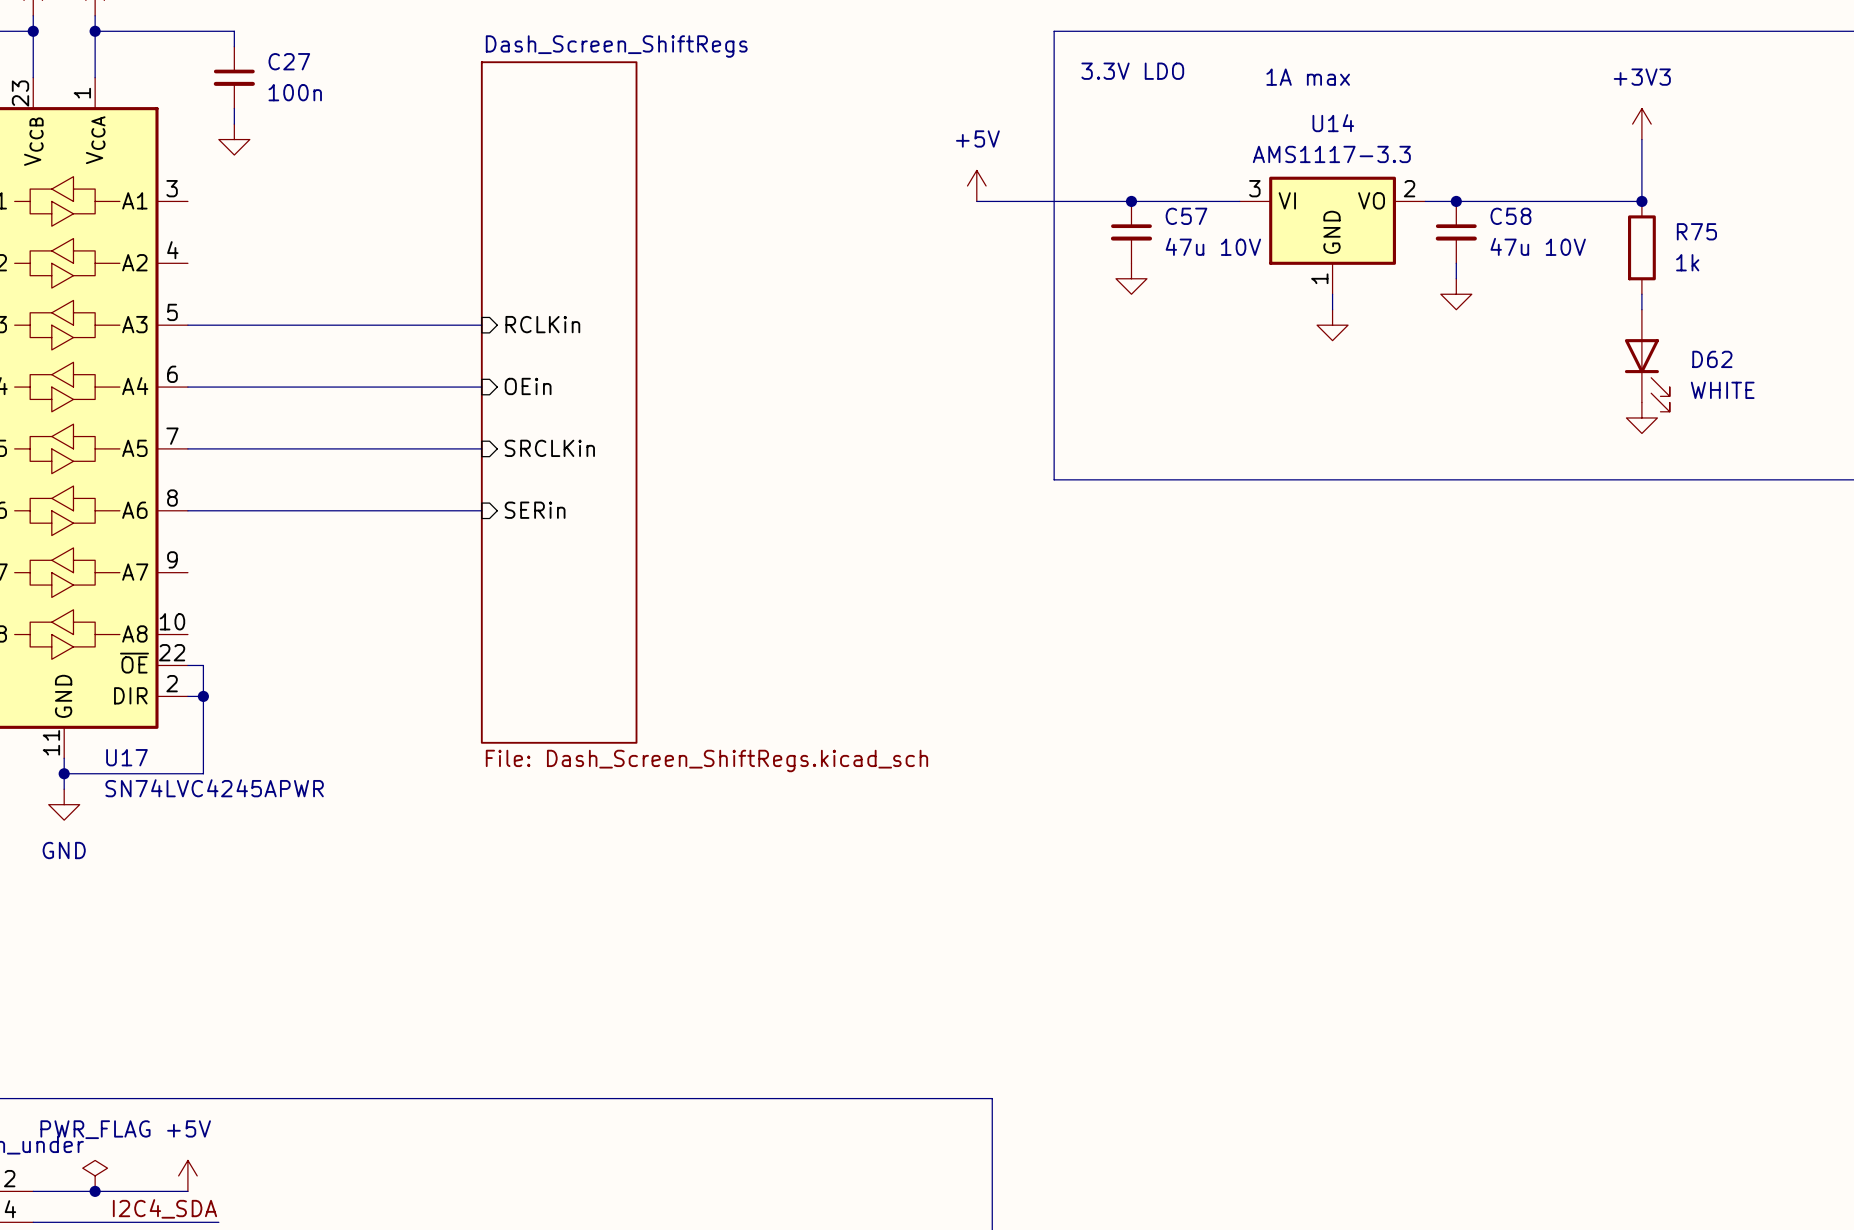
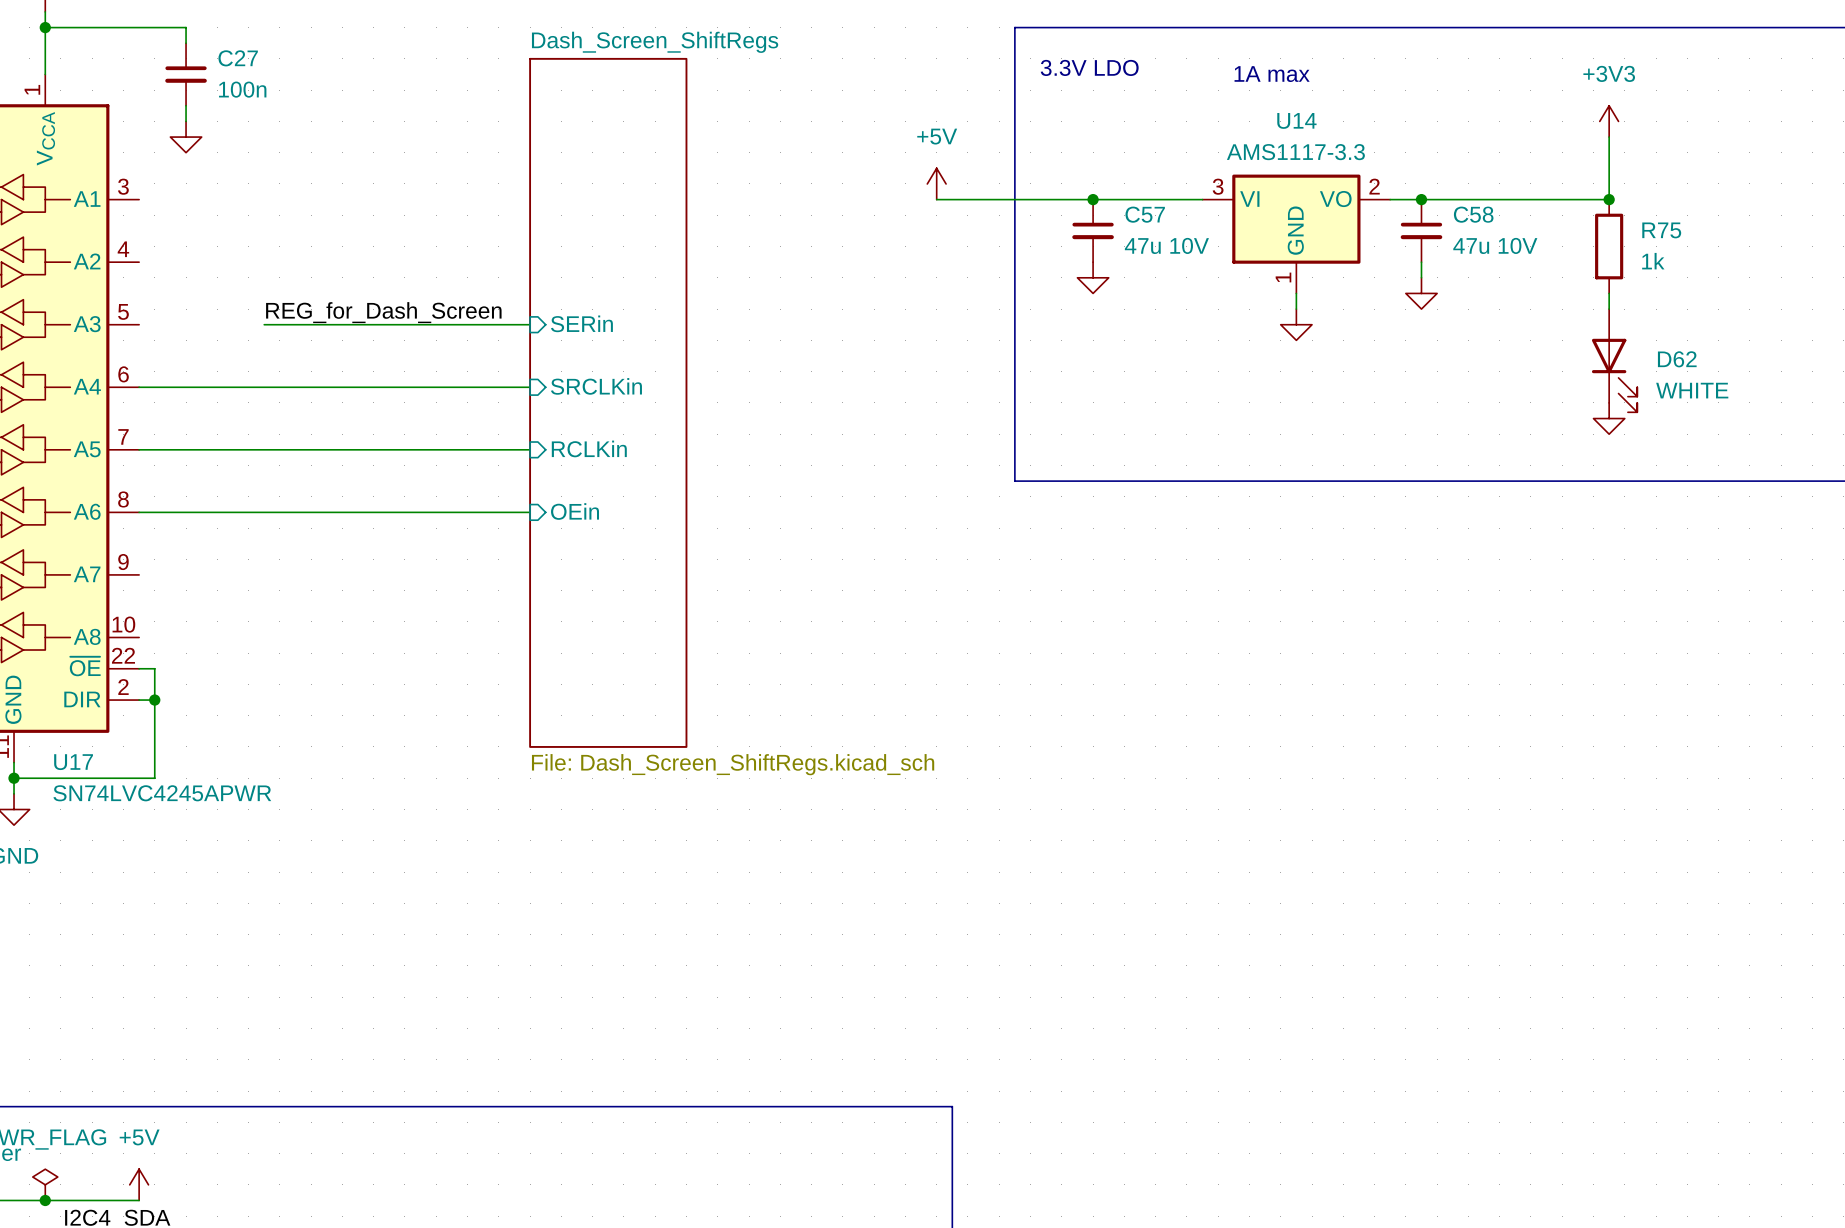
label: none -> REG_for_Dash_Screen (383, 312)
sheet pin position: RCLKin (542, 324) -> RCLKin (589, 448)
wire: (187, 325) (311, 325) -> none
wire: none -> (436, 324) (530, 324)
sheet pin position: OEin (528, 386) -> OEin (575, 511)
wire: none -> (436, 387) (530, 387)
sheet Dash_Screen_ShiftRegs position: (559, 402) -> (608, 402)
wire: none -> (436, 449) (530, 449)
sheet pin position: SRCLKin (549, 448) -> SRCLKin (596, 386)
wire: none -> (436, 512) (530, 512)
sheet pin position: SERin (535, 510) -> SERin (581, 323)

